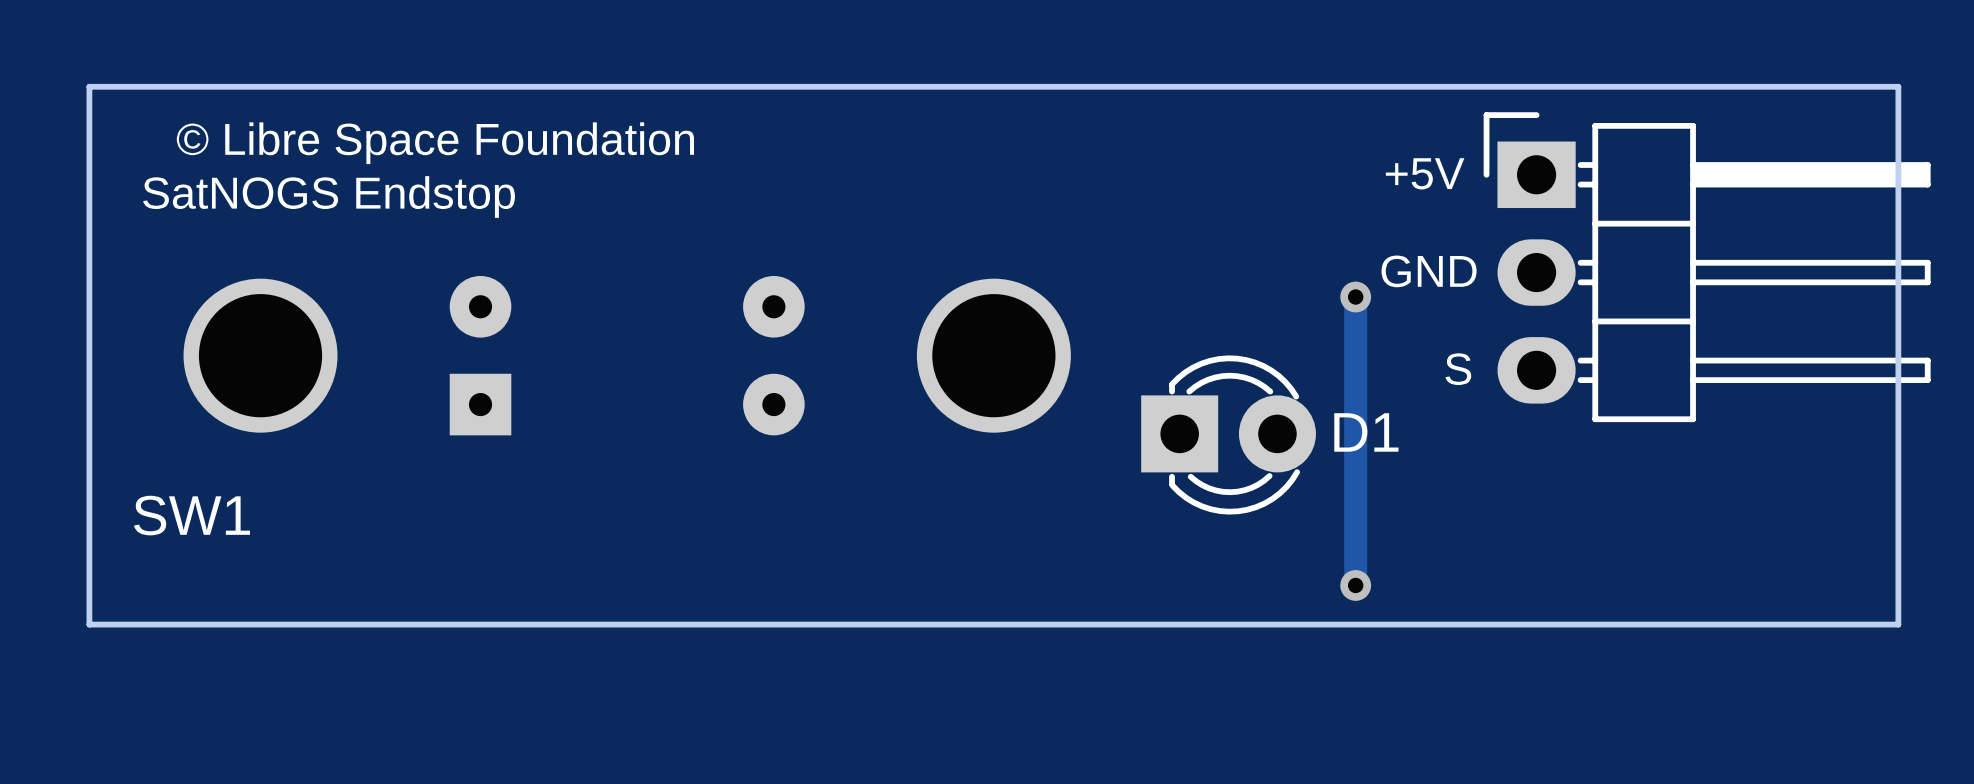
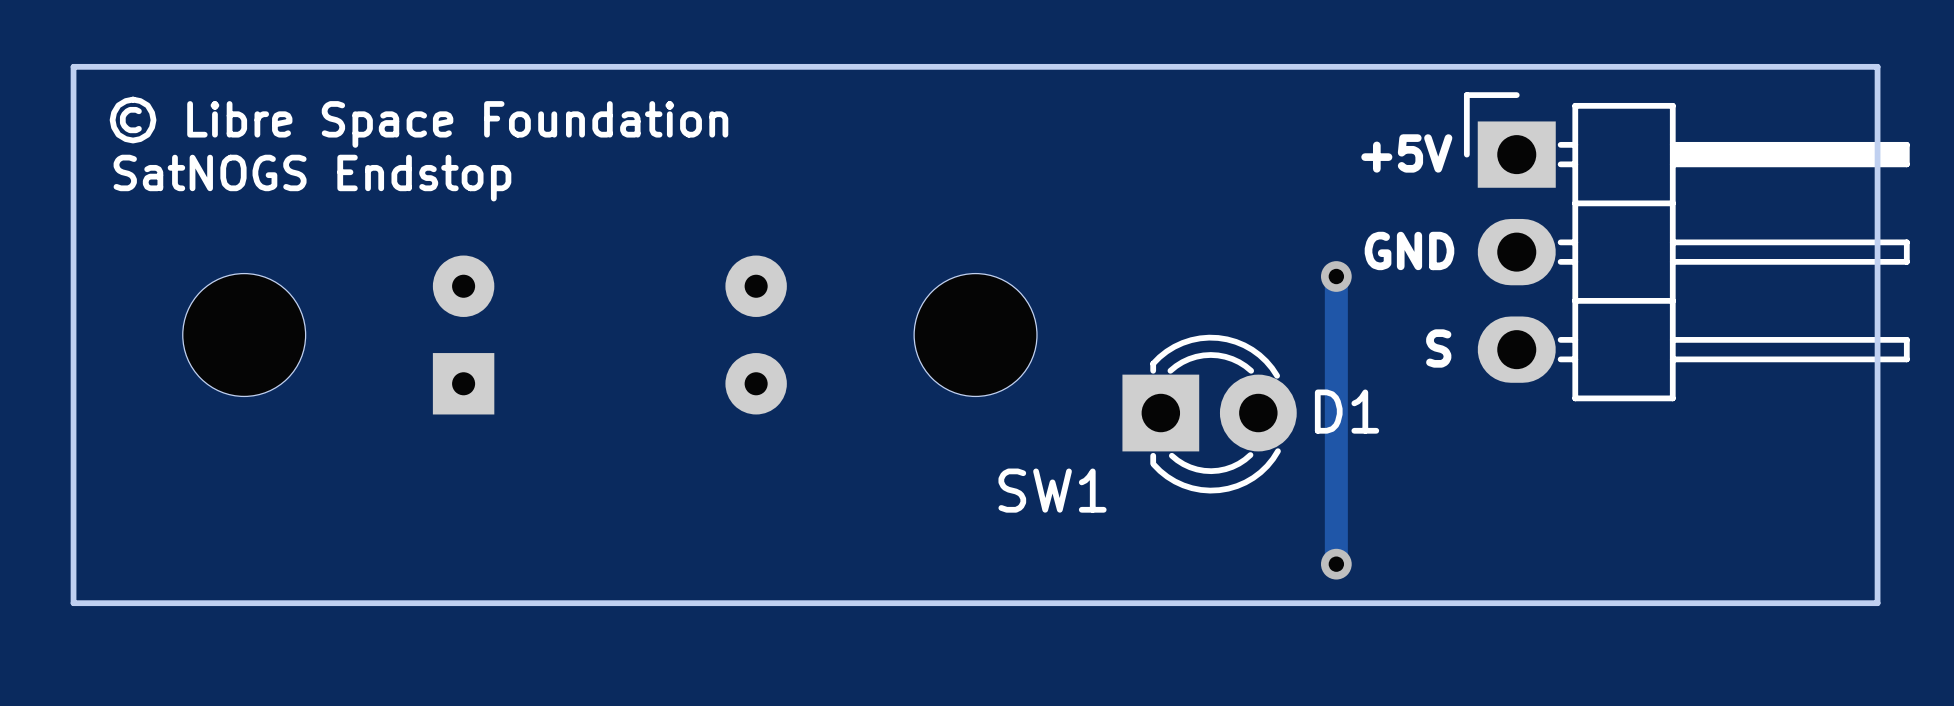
SW1 footprint: [183, 275, 1071, 436] -> [182, 255, 1037, 415]
SW1 name position: SW1 (191, 515) -> SW1 (1052, 490)

